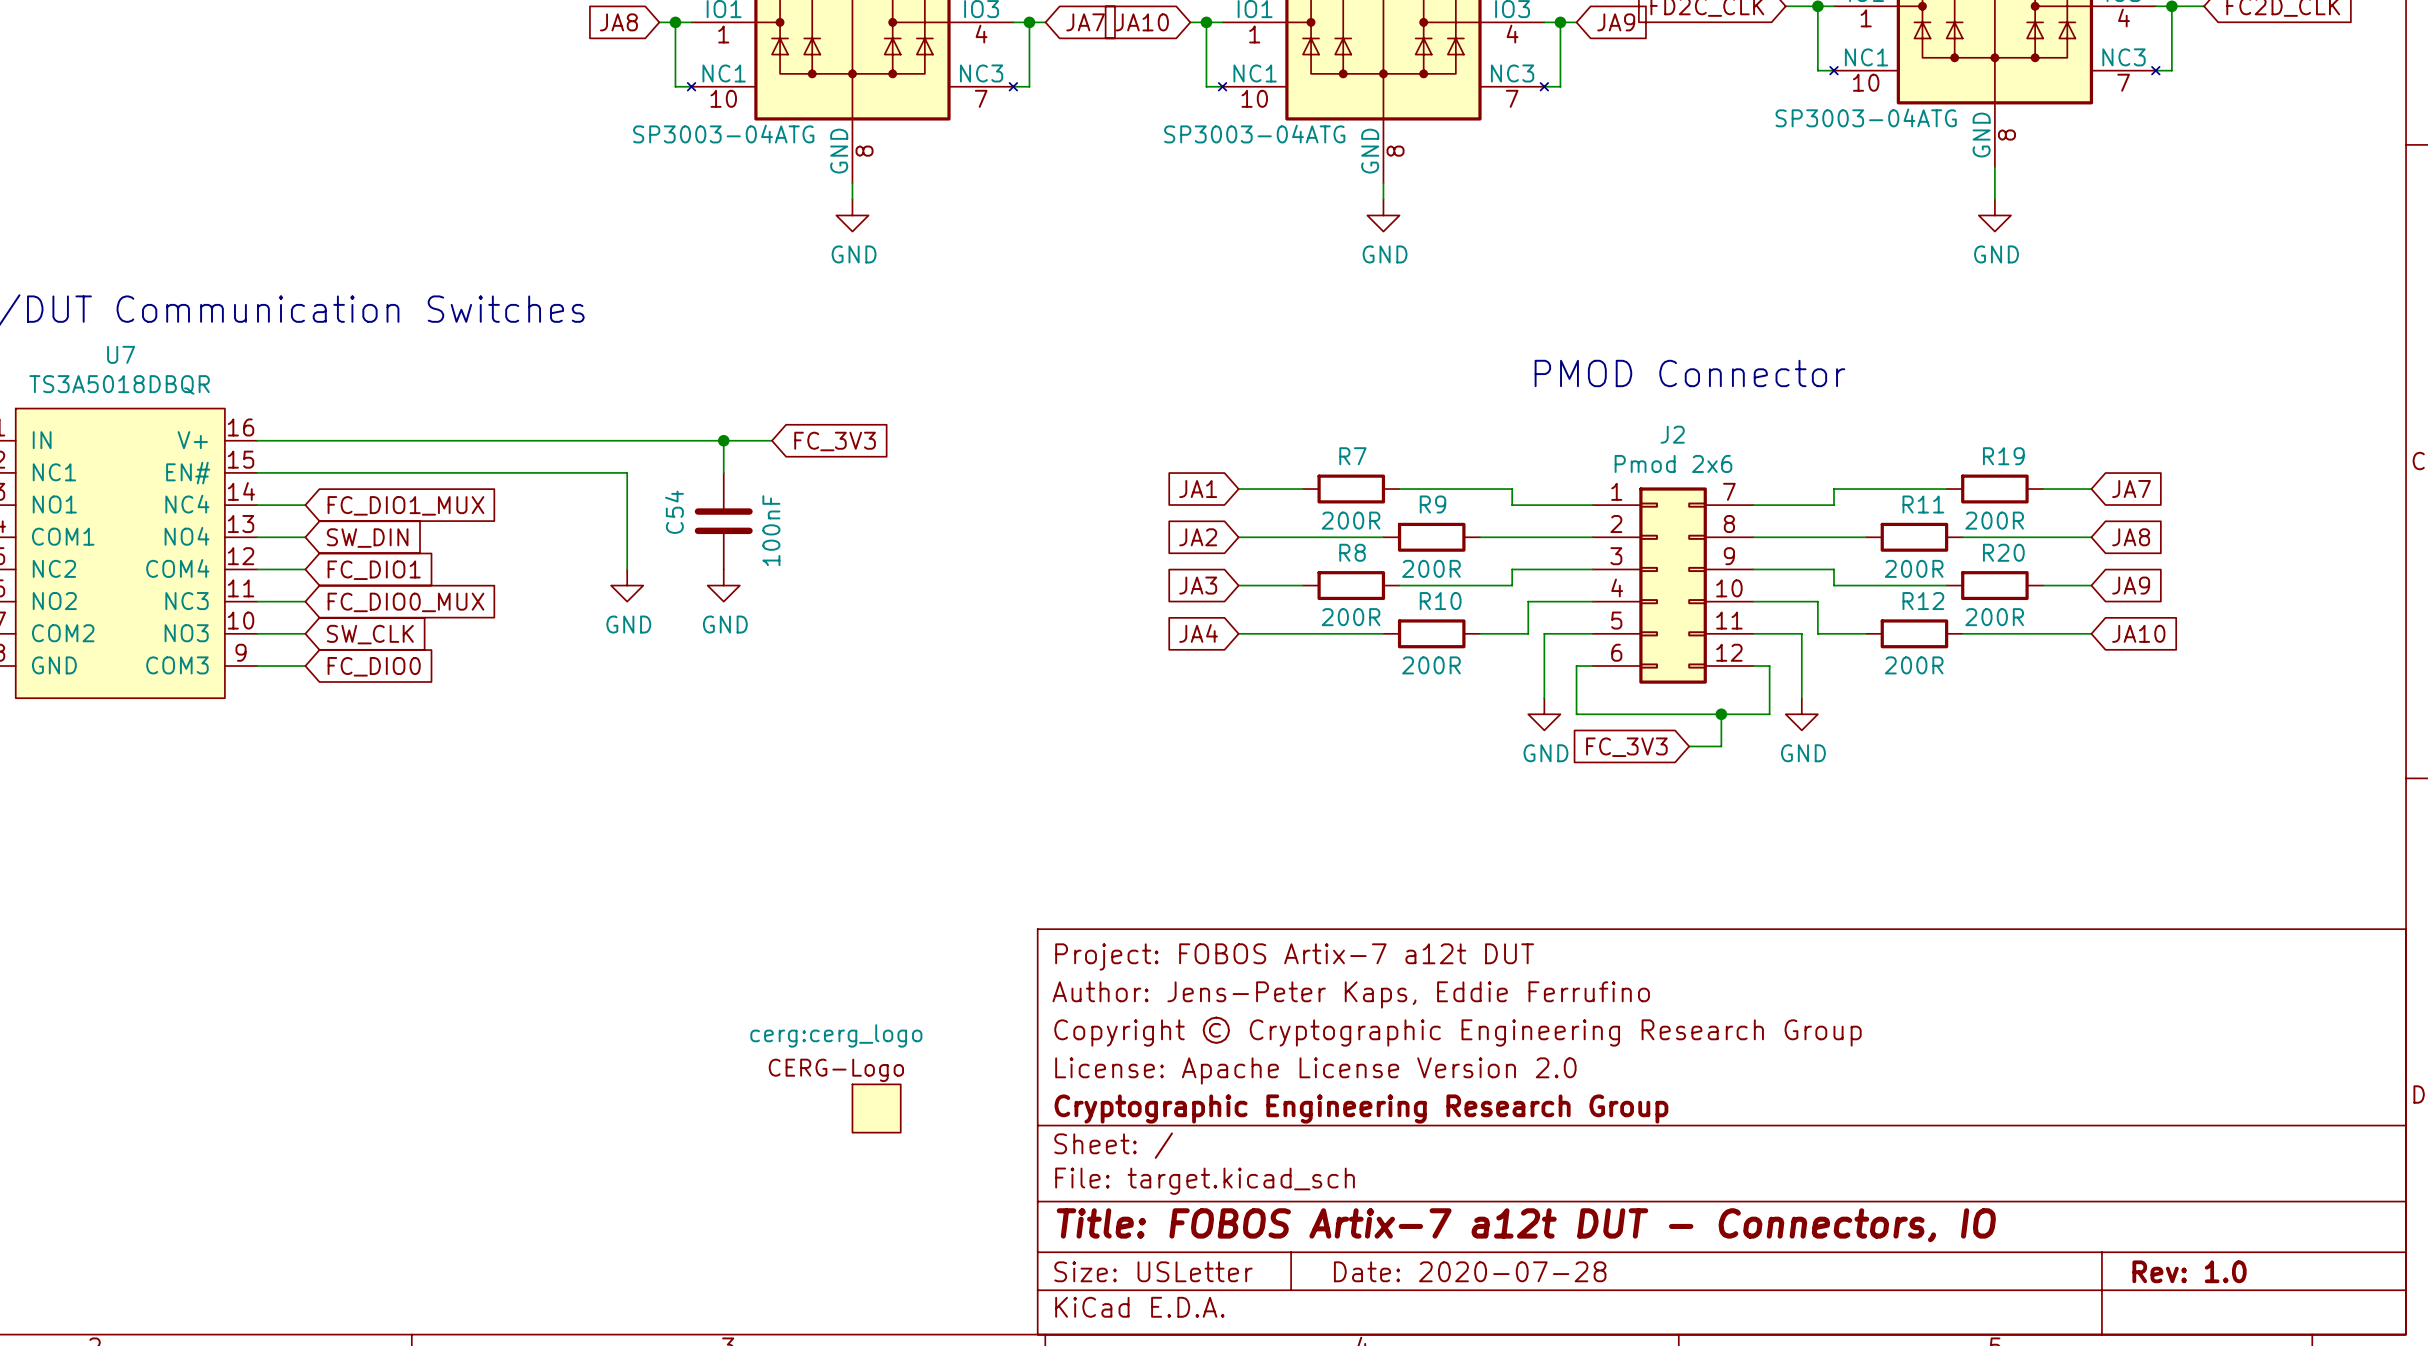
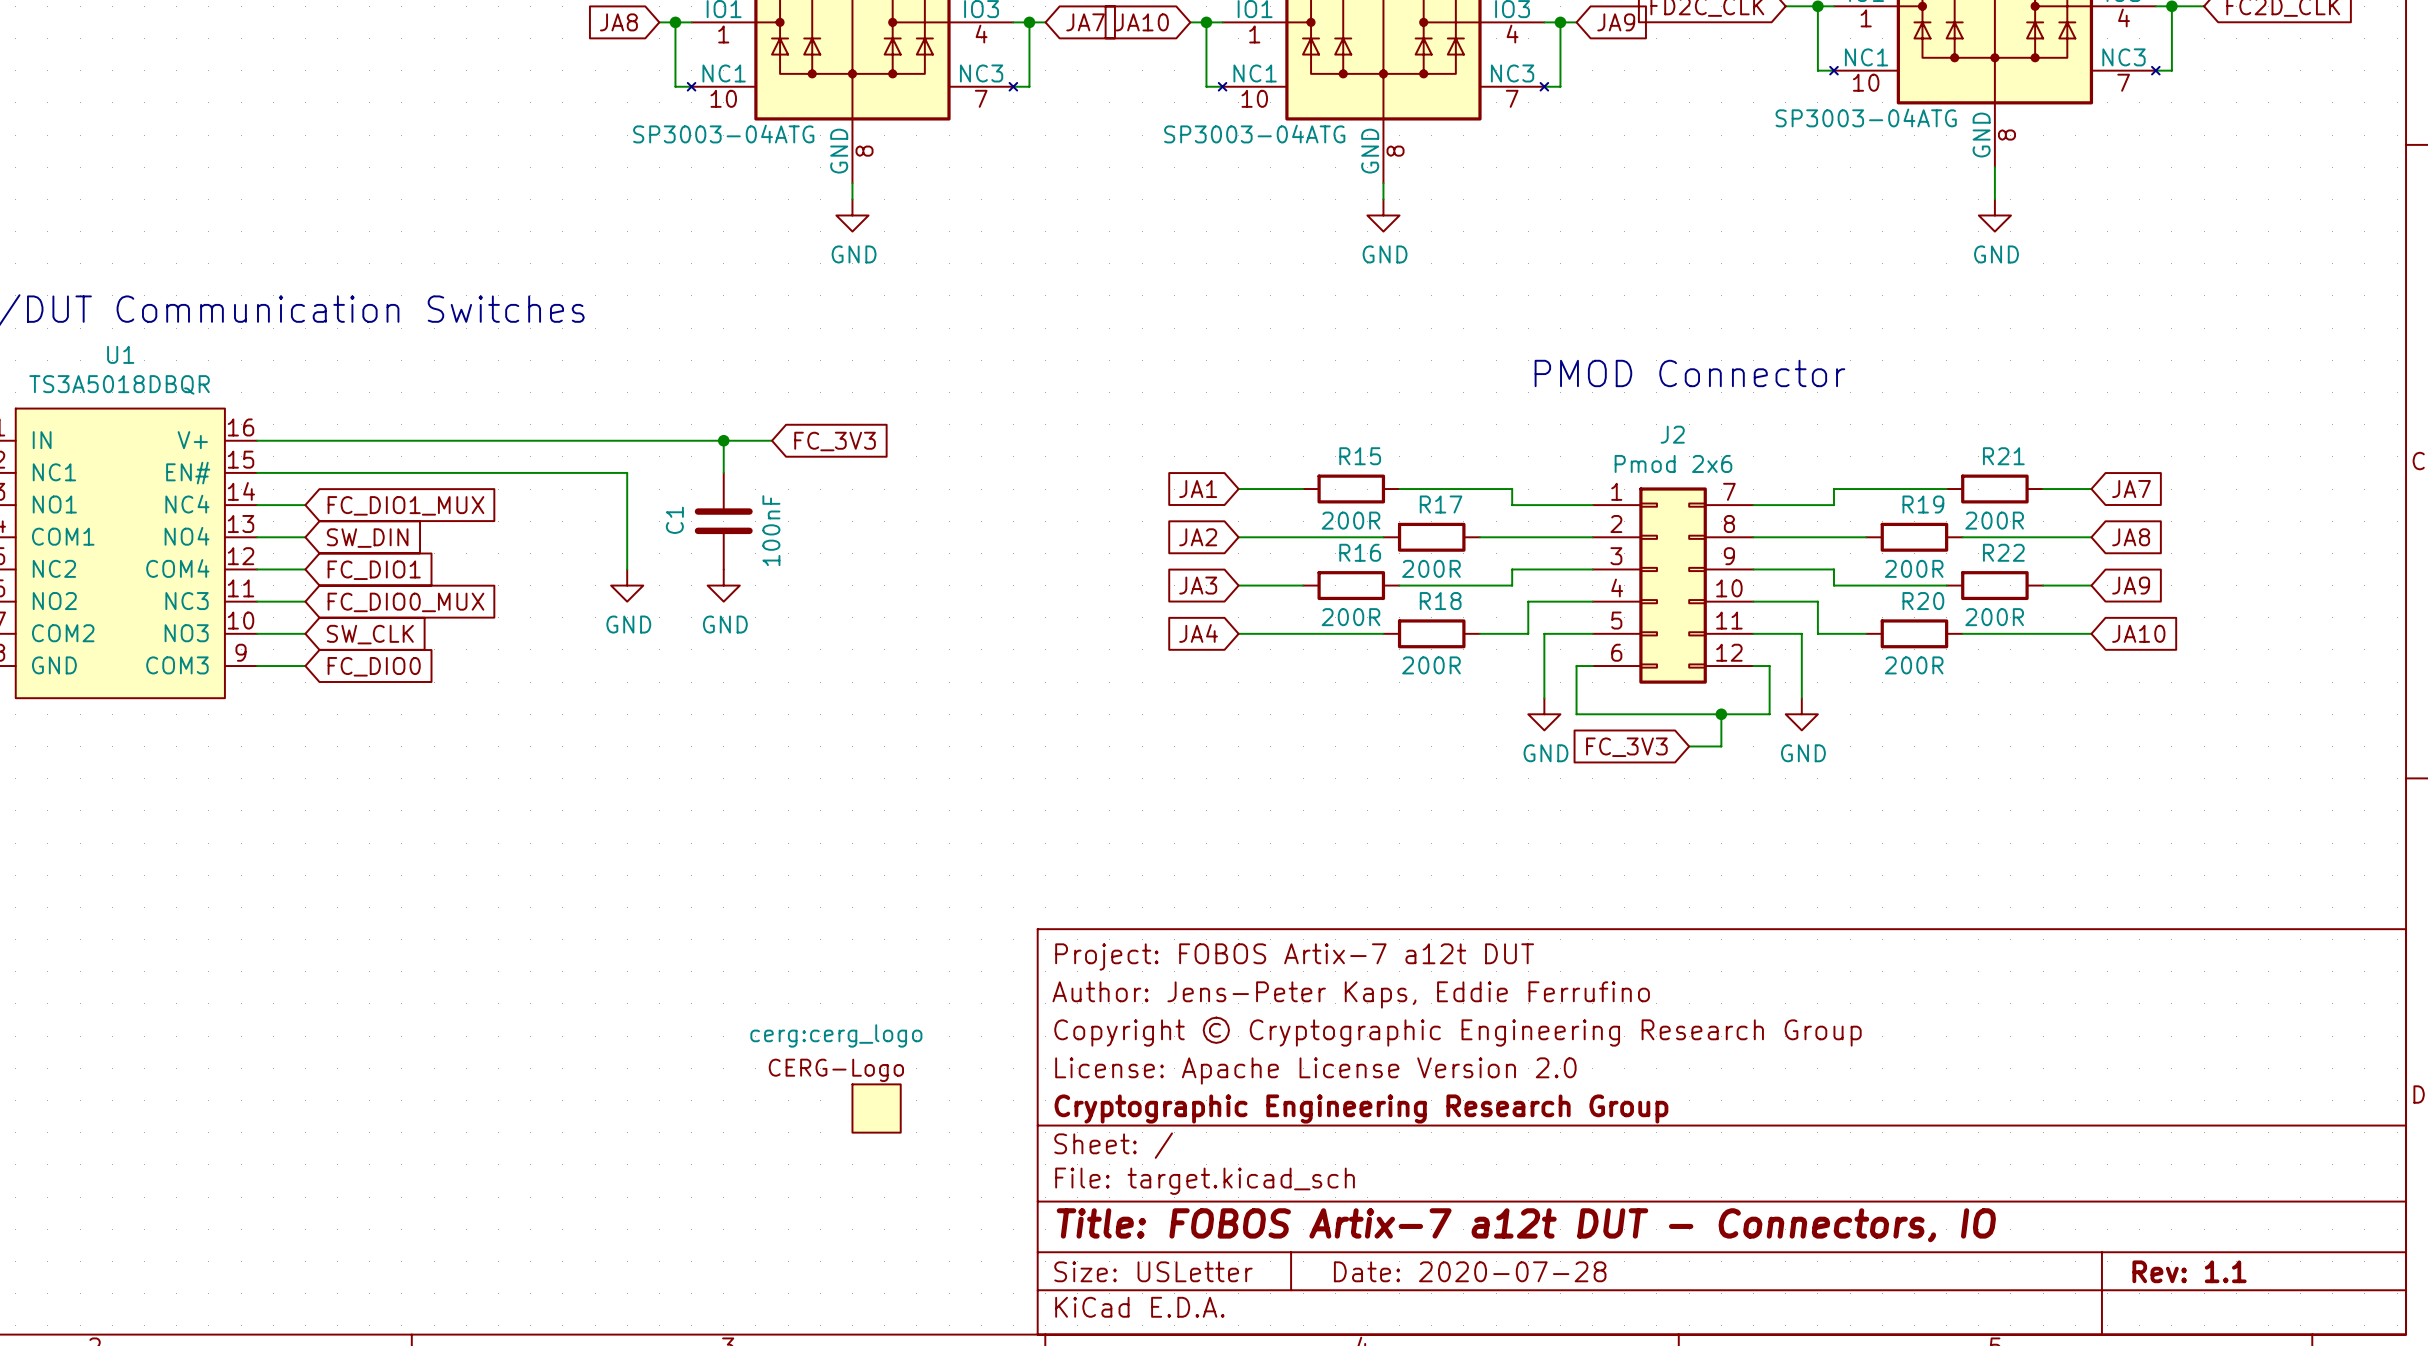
U7 name: U7 (121, 354) -> U1 (120, 354)
R7 name: R7 (1352, 456) -> R15 (1360, 456)
R19 name: R19 (2003, 456) -> R21 (2003, 456)
R9 name: R9 (1432, 504) -> R17 (1441, 504)
R11 name: R11 (1923, 504) -> R19 (1923, 504)
C54 name: C54 (674, 512) -> C1 (674, 520)
R8 name: R8 (1352, 552) -> R16 (1360, 552)
R20 name: R20 (2003, 552) -> R22 (2003, 552)
R10 name: R10 (1440, 601) -> R18 (1440, 601)
R12 name: R12 (1923, 601) -> R20 (1923, 601)
title block: Rev: 1.0 (2189, 1271) -> Rev: 1.1 (2189, 1271)

